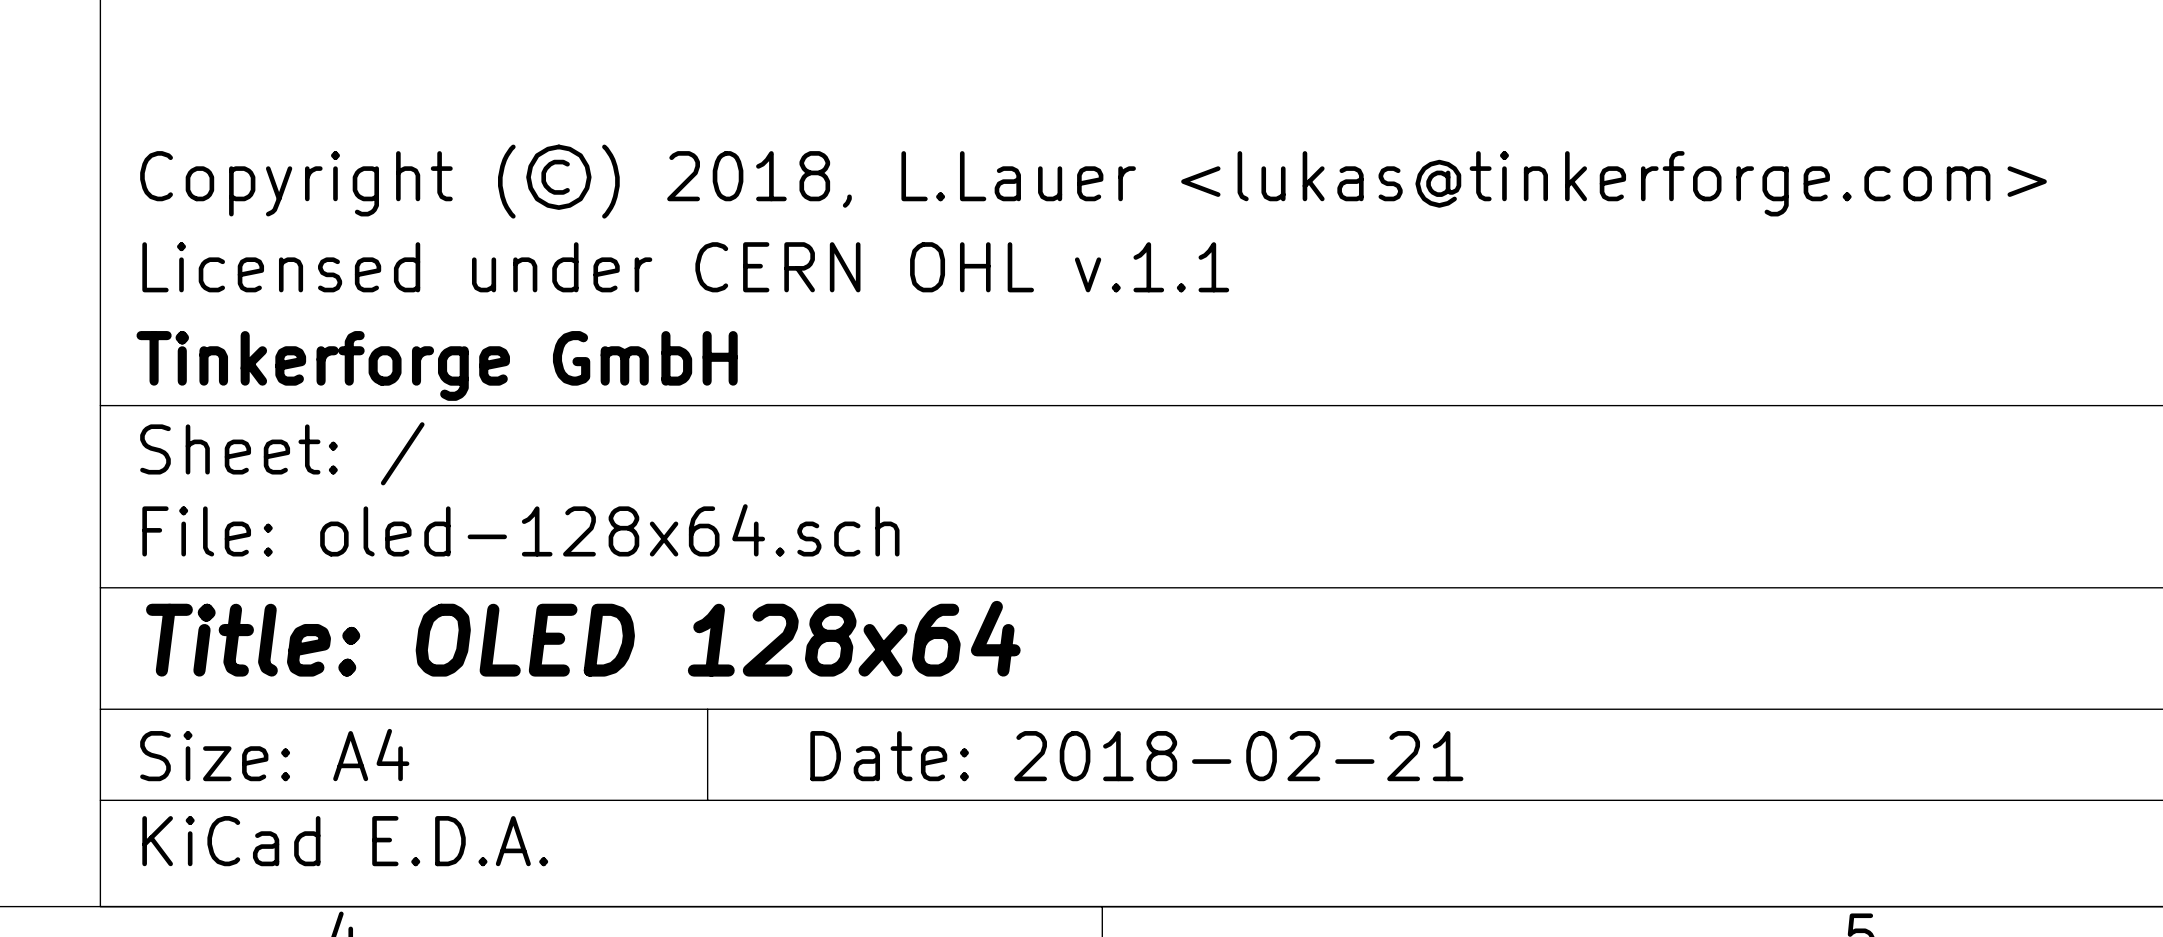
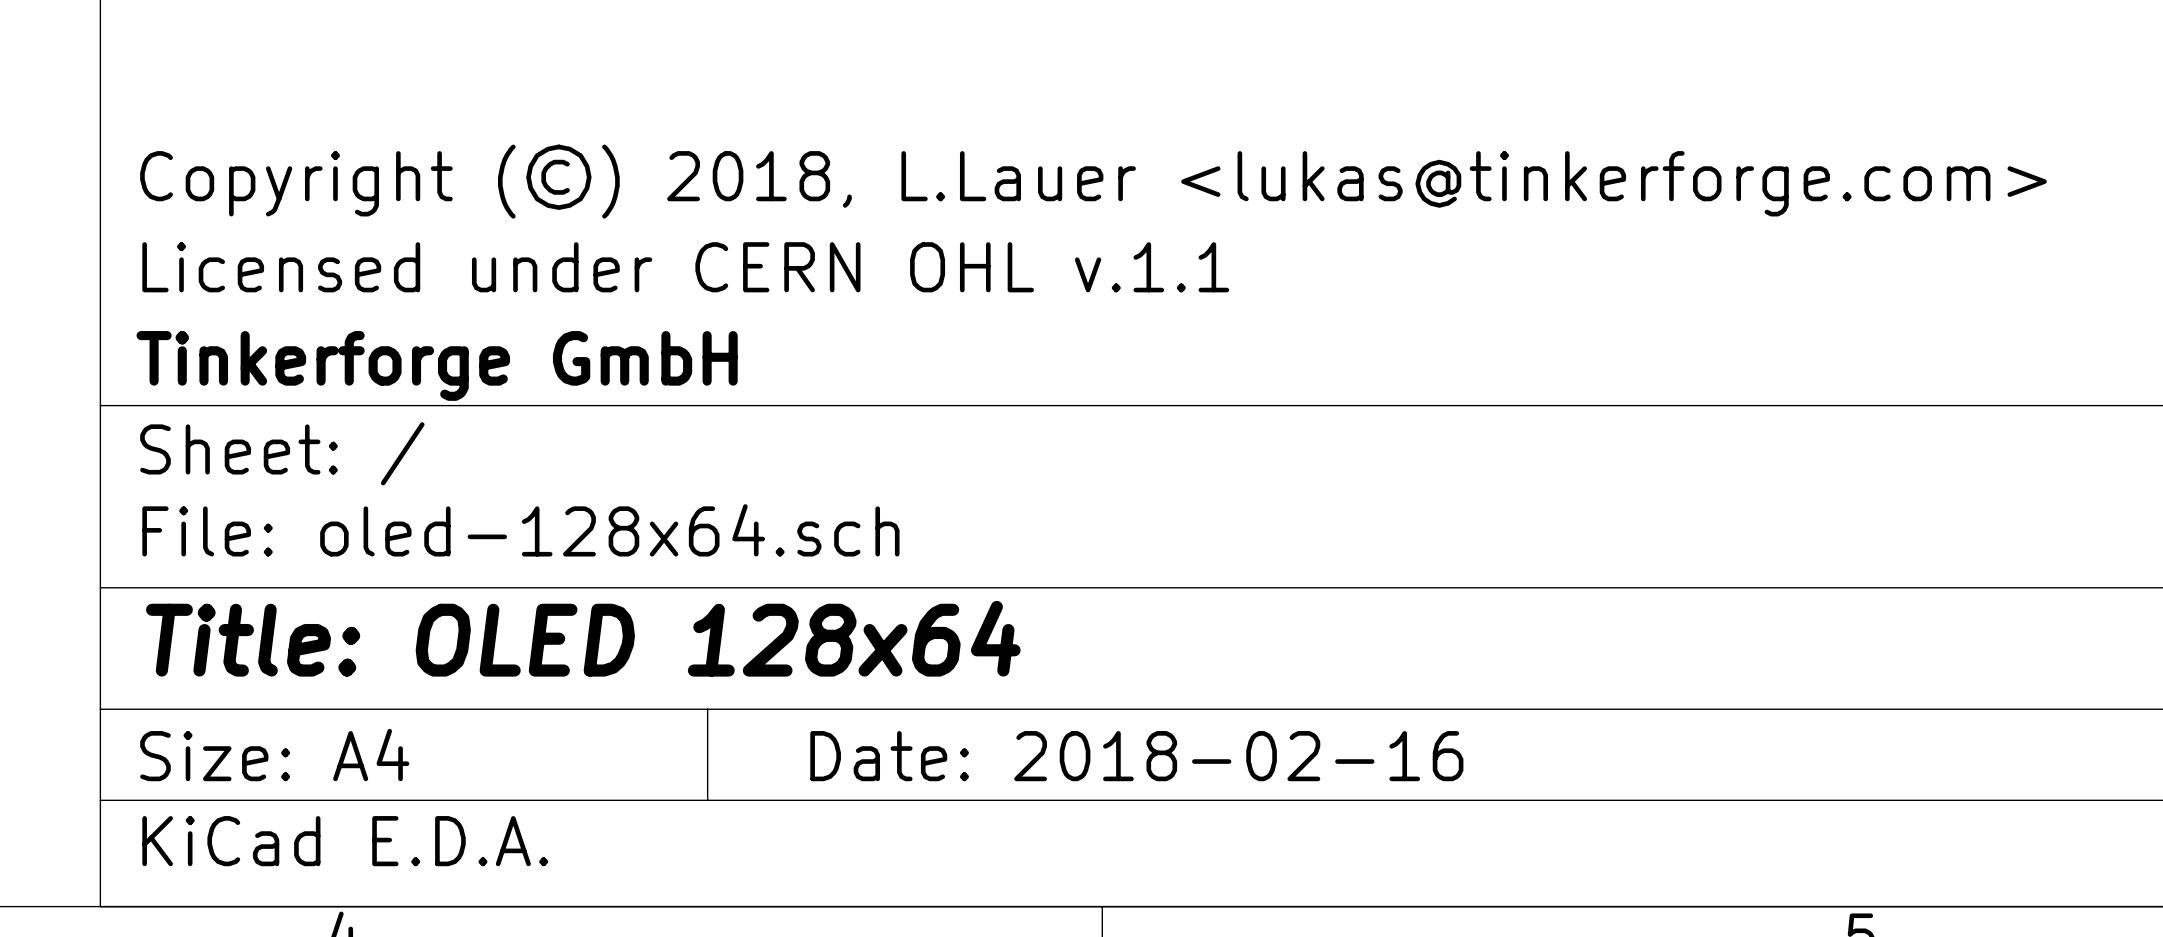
title block: Date: 2018-02-21 (1136, 756) -> Date: 2018-02-16 (1136, 756)

